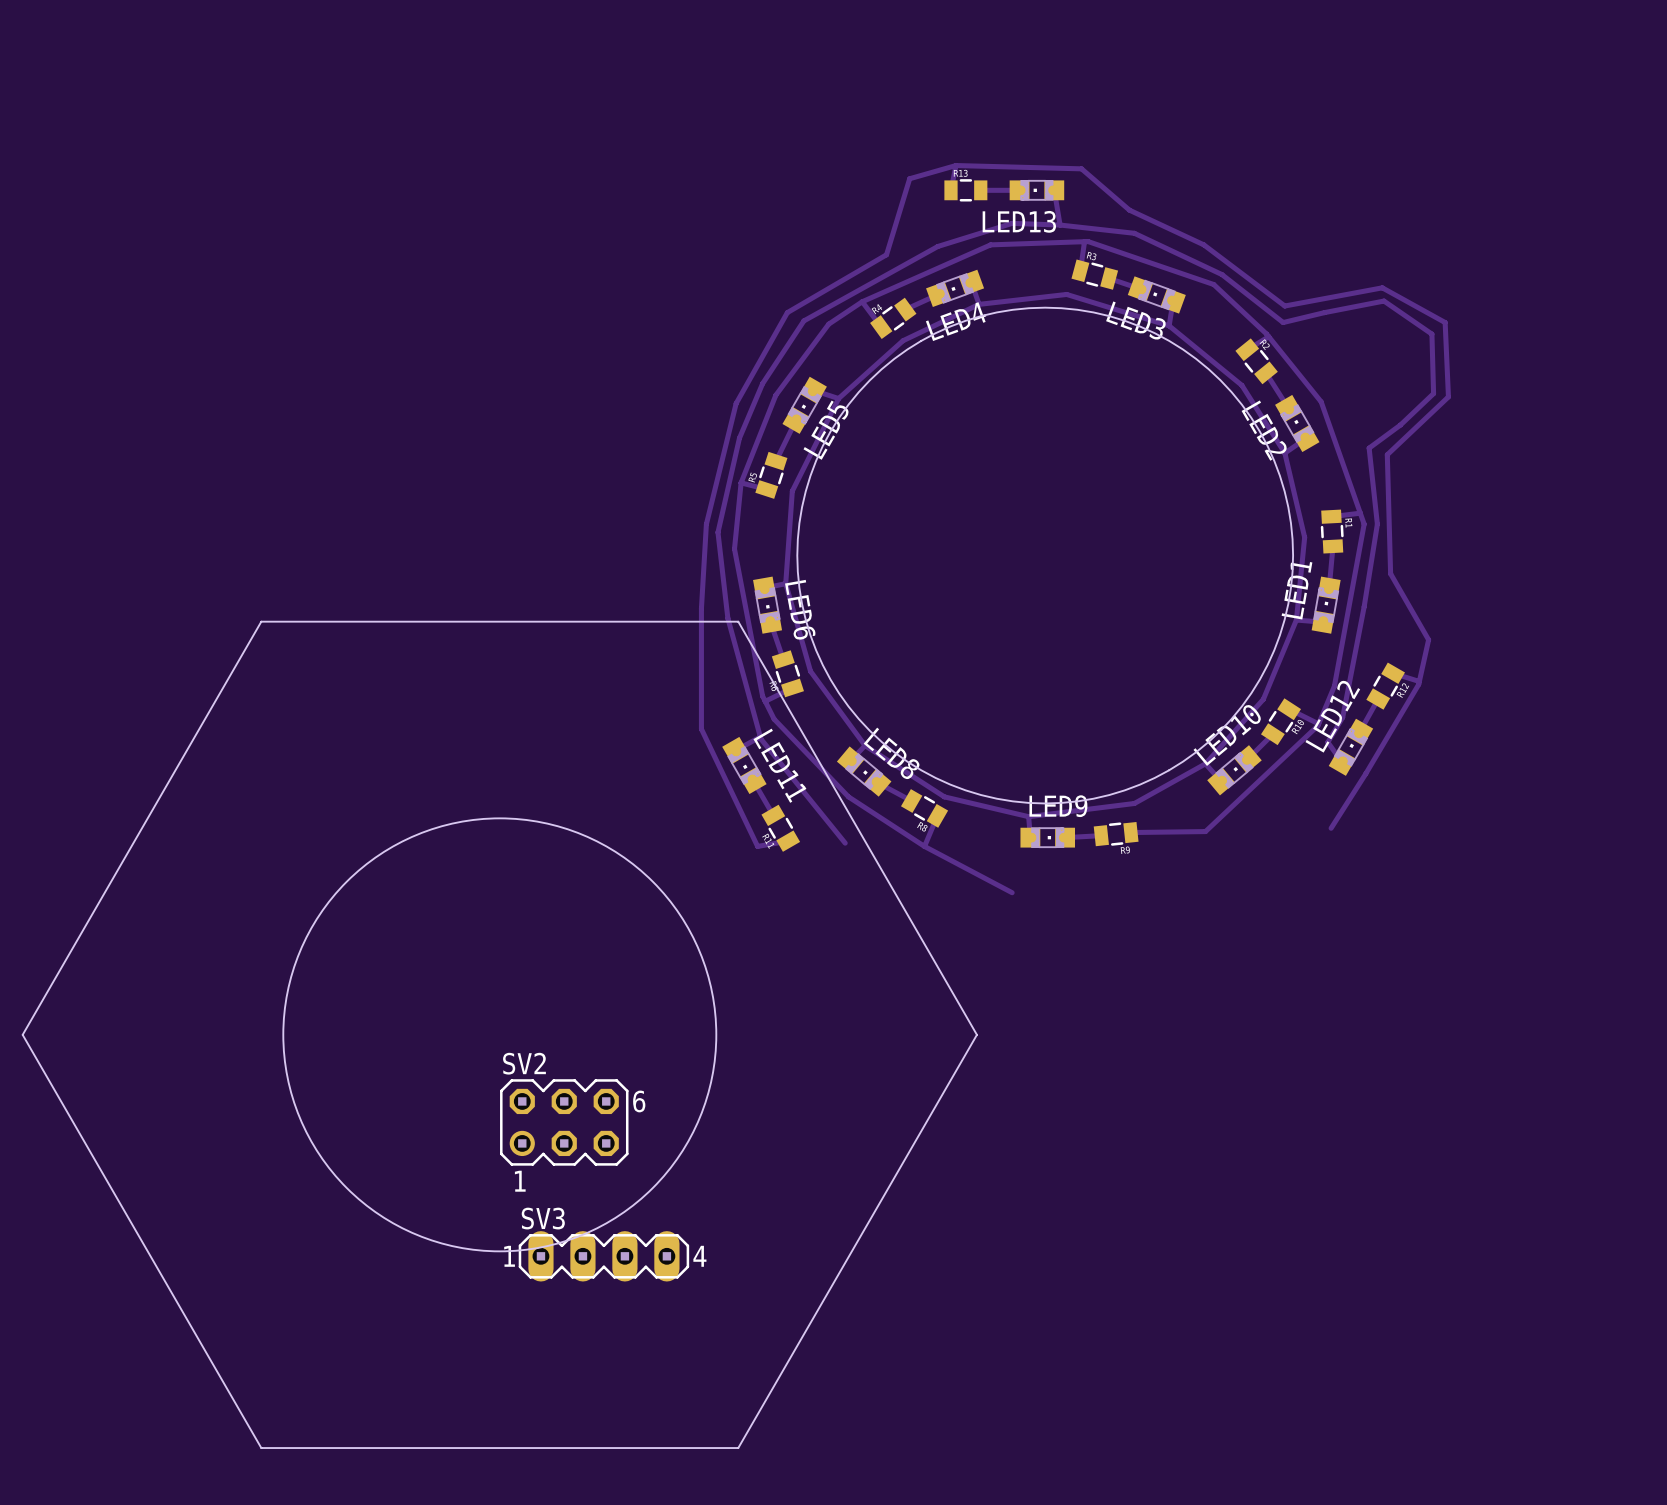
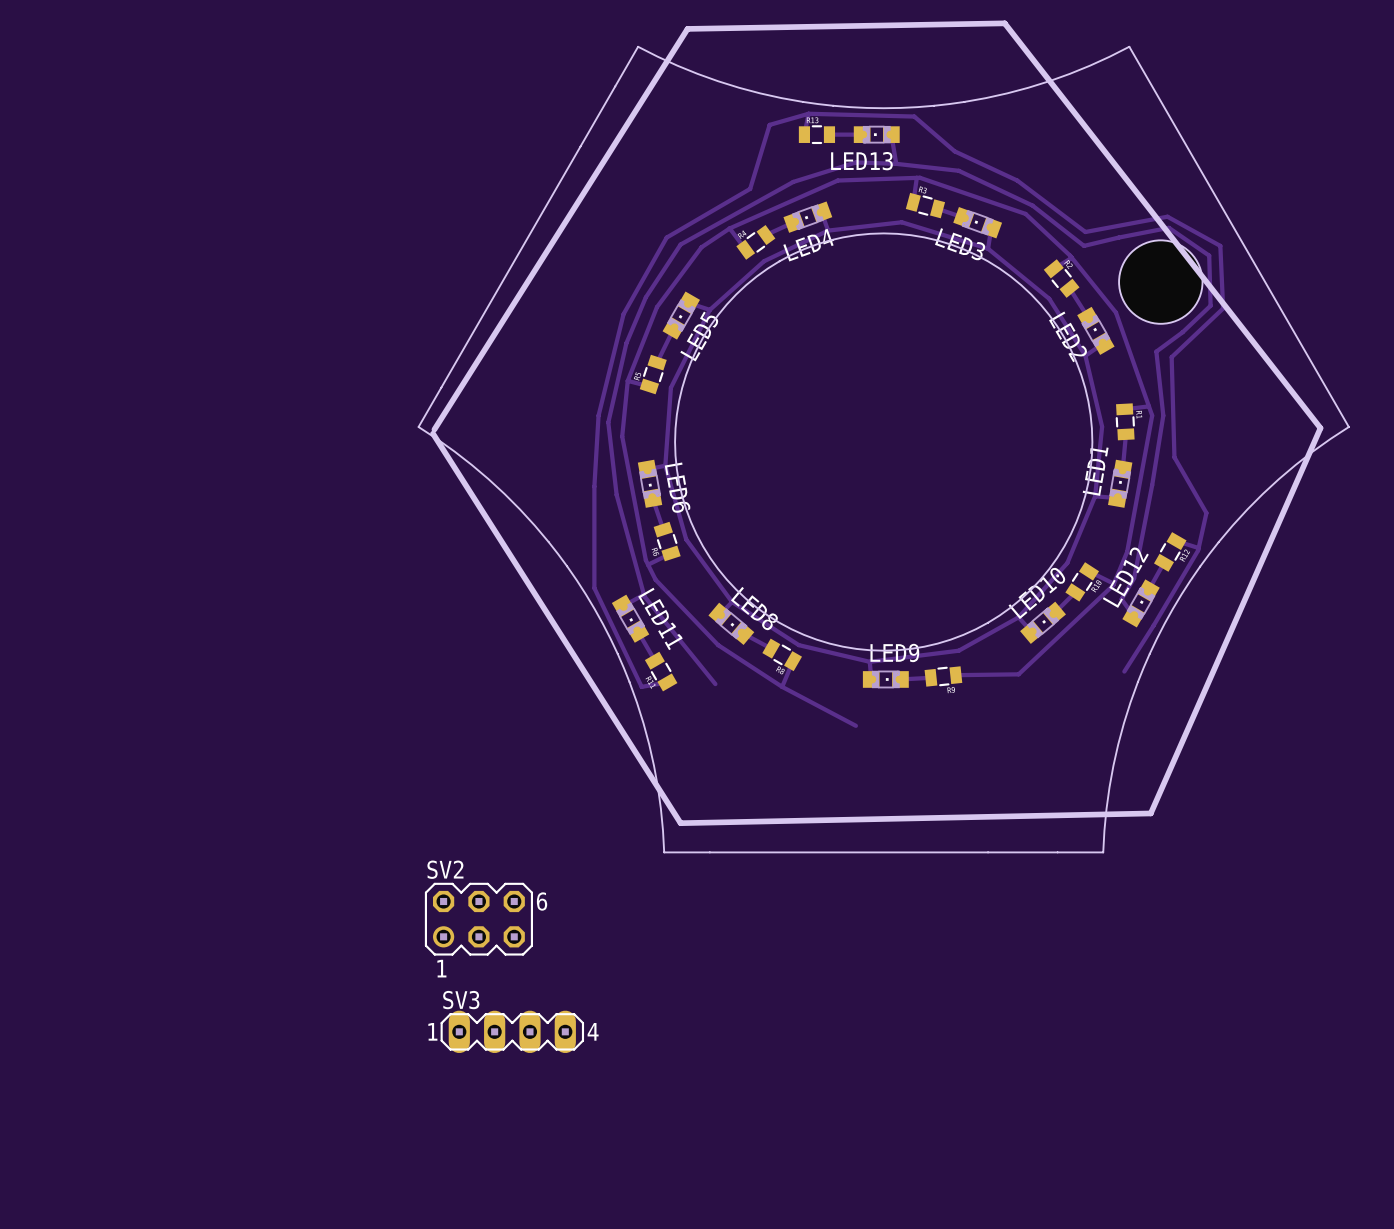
board edge: none -> (638, 46) (418, 426) (471, 465) (519, 509) (558, 554) (594, 608) (623, 667) (643, 723) (657, 787) (664, 852) (1103, 852) (1109, 787) (1123, 723) (1143, 667) (1172, 608) (1209, 554) (1247, 509) (1295, 465) (1348, 426) (1129, 46) (1069, 73) (1007, 93) (949, 104) (883, 108) (818, 104) (760, 93) (697, 73) (638, 46)
hole: none -> (1160, 282)
board edge: none -> (434, 429) (687, 28) (1004, 23) (1320, 428) (1150, 813) (680, 823) (433, 433)
board edge: (261, 621) (738, 621) (976, 1034) (738, 1448) (261, 1448) (22, 1034) (261, 621) -> none
round board edge: [282, 817, 718, 1253] -> none

